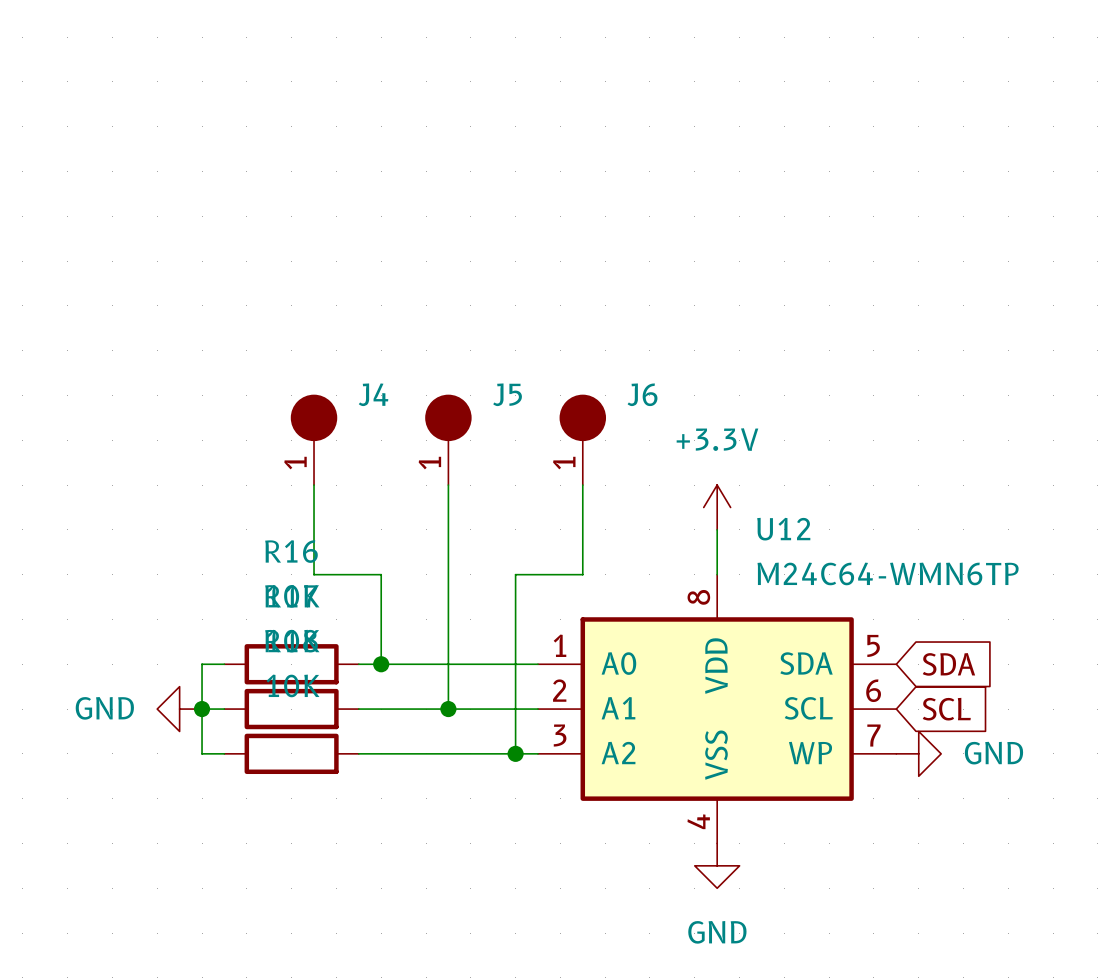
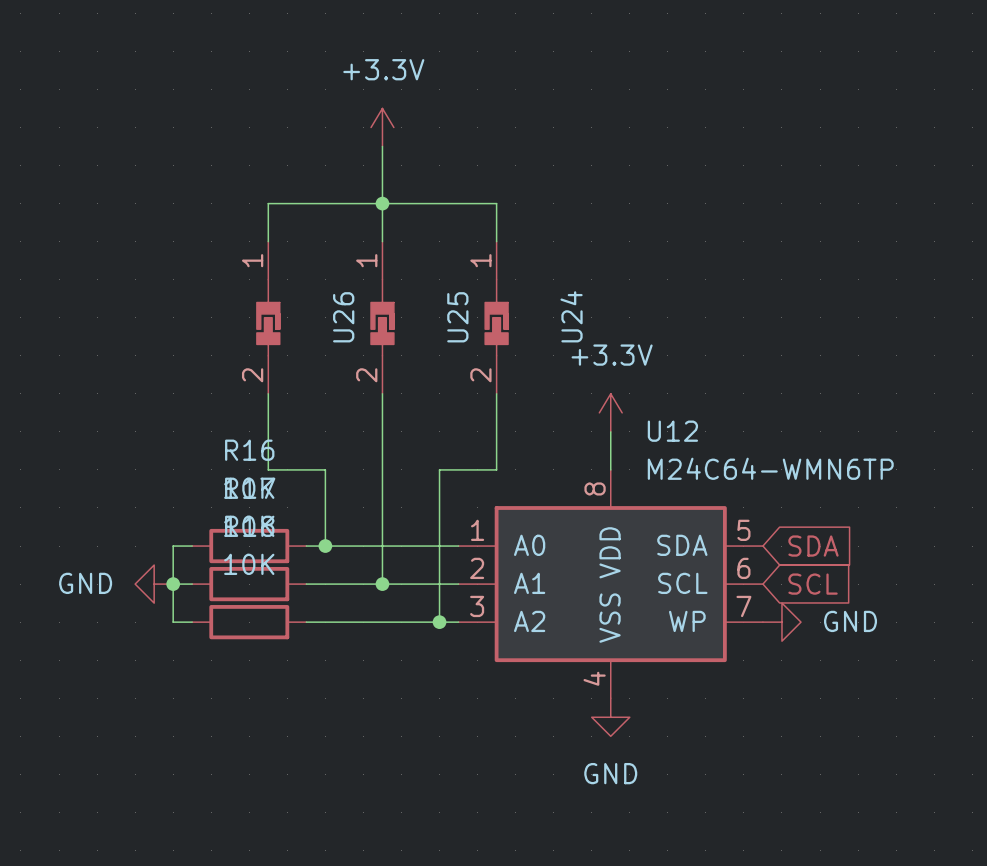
power symbol: none -> +3.3V (382, 127)
wire: none -> (382, 146) (382, 241)
junction: none -> (382, 203)
wire: none -> (268, 241) (268, 203) (496, 203) (496, 241)
U26: none -> (268, 317)
U25: none -> (382, 317)
U24: none -> (496, 317)
J4: (314, 440) -> none
J5: (448, 440) -> none
J6: (582, 440) -> none

